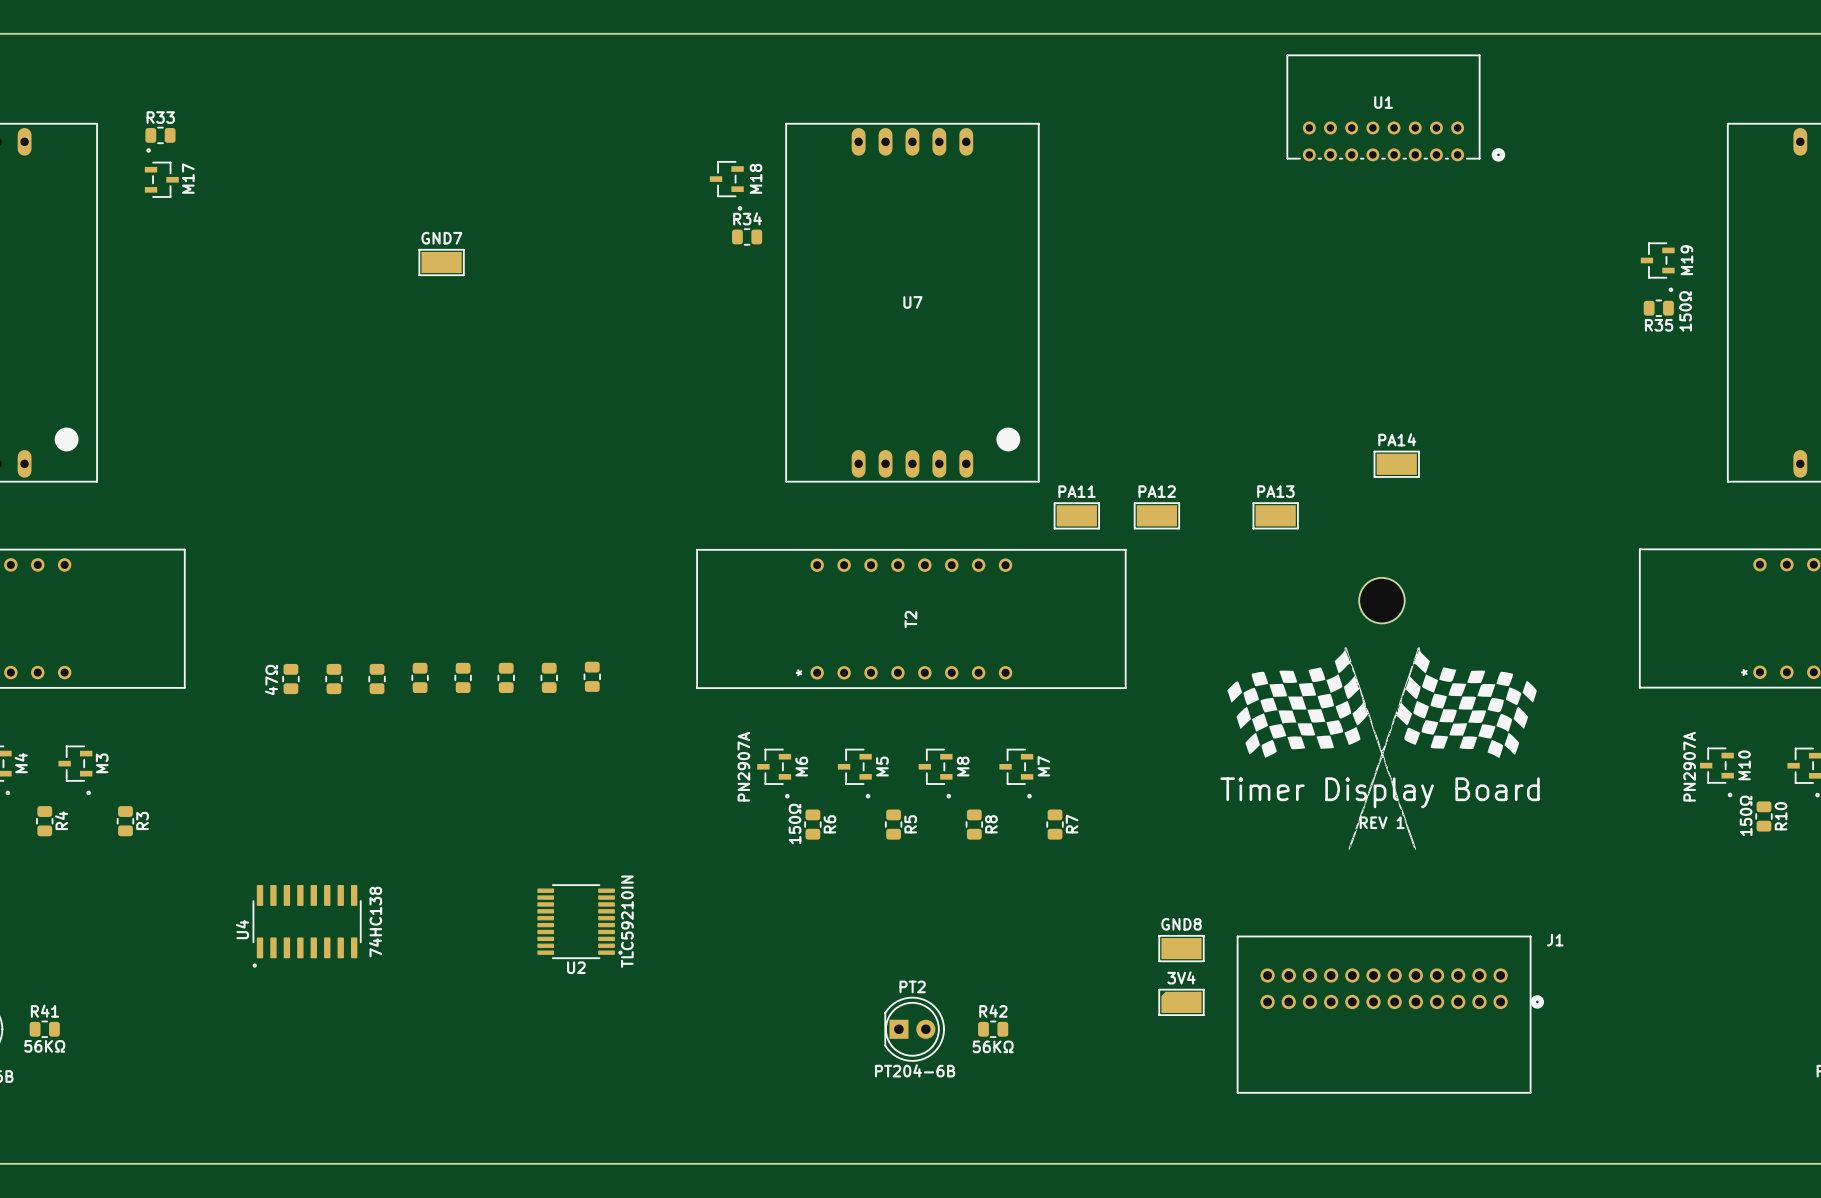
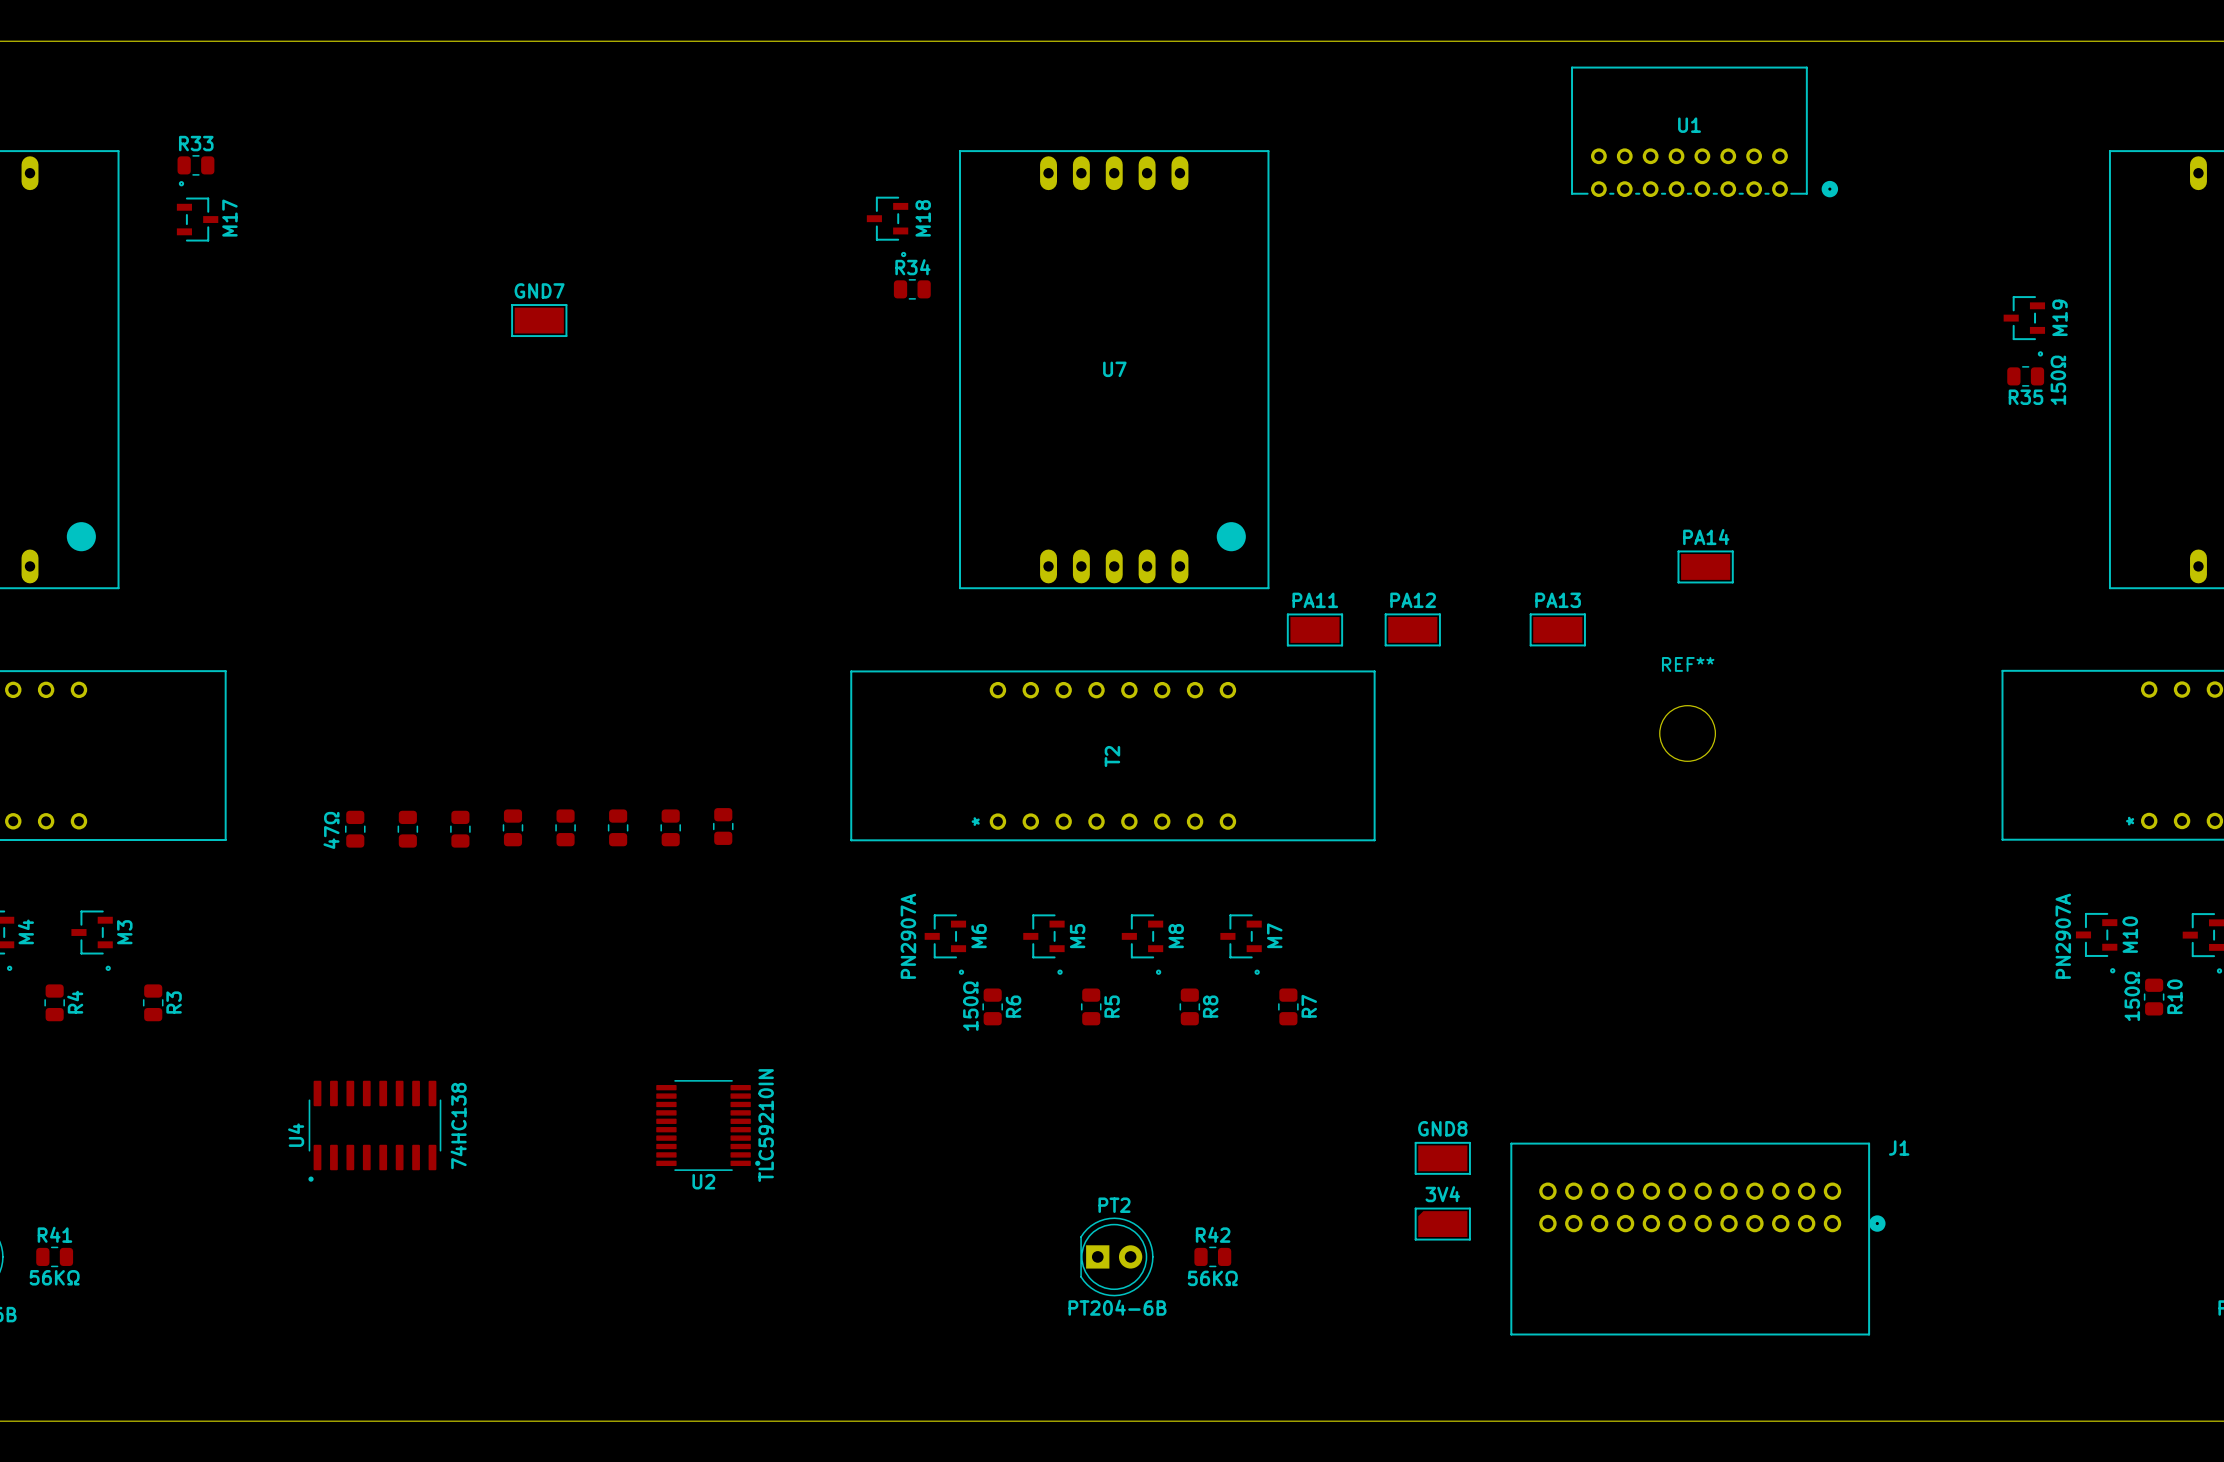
REF** name: none -> REF** (1688, 664)
drawing: [1227, 647, 1537, 850] -> none
text: Timer Display Board (1380, 792) -> none
text: REV 1 (1382, 822) -> none

